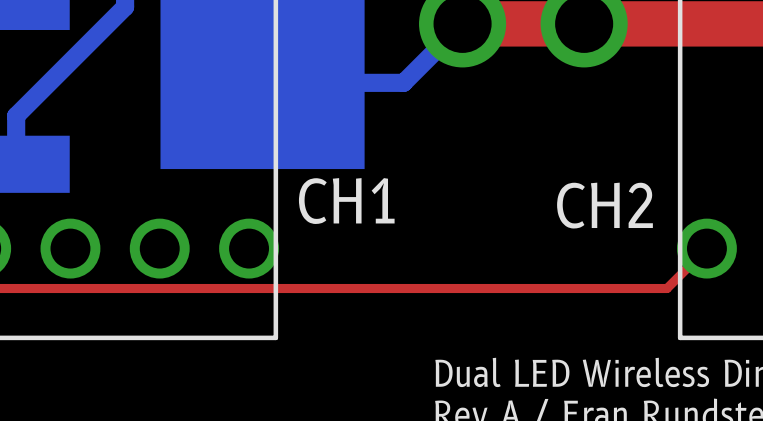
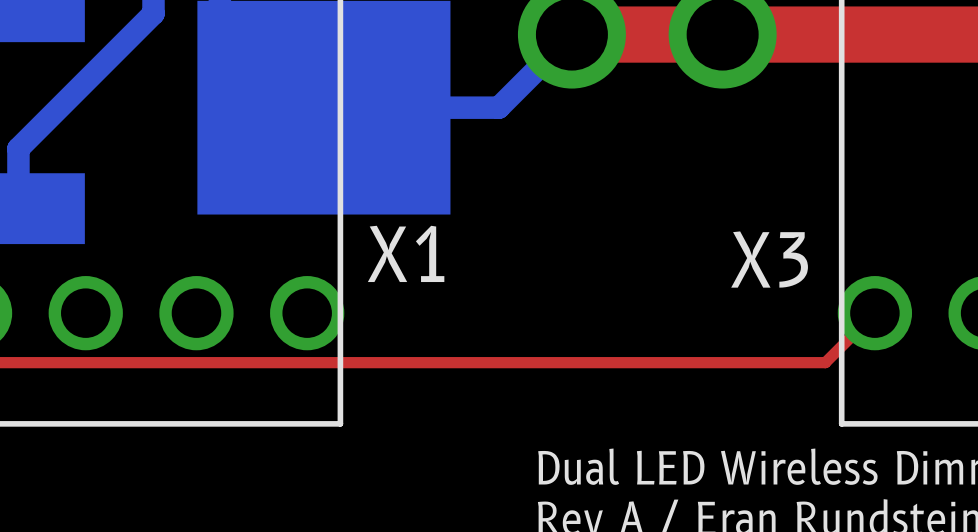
CH1 name: CH1 (346, 201) -> X1 (406, 253)
CH2 name: CH2 (604, 205) -> X3 (769, 259)

